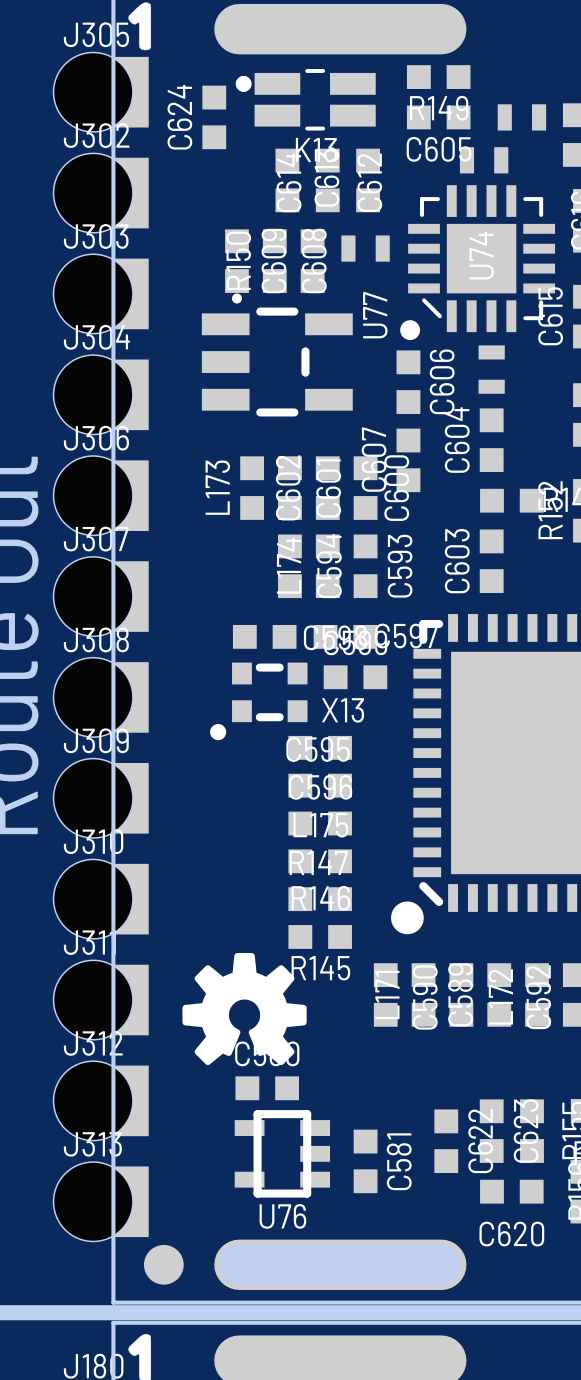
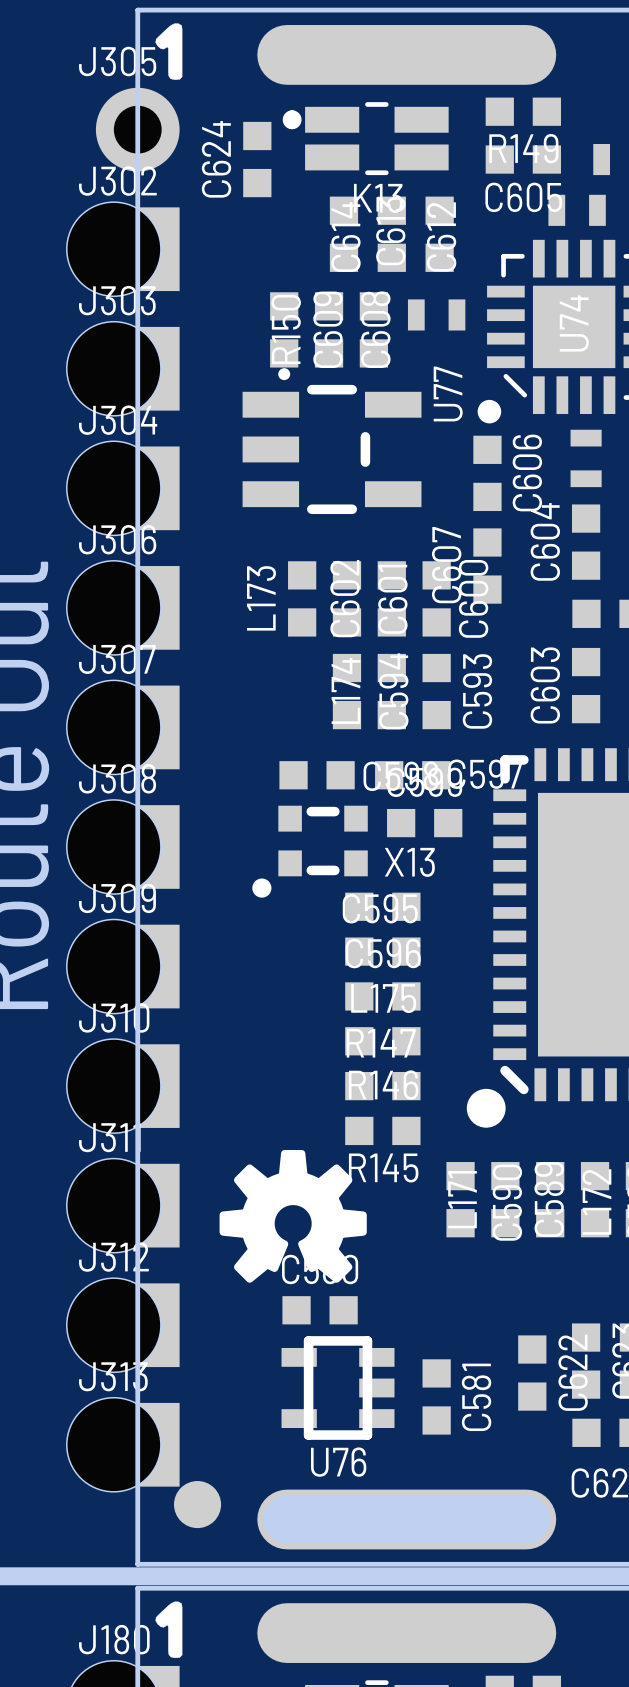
J305 footprint: [53, 52, 149, 132] -> [95, 87, 180, 172]
part position: (163, 1264) -> (197, 1504)

